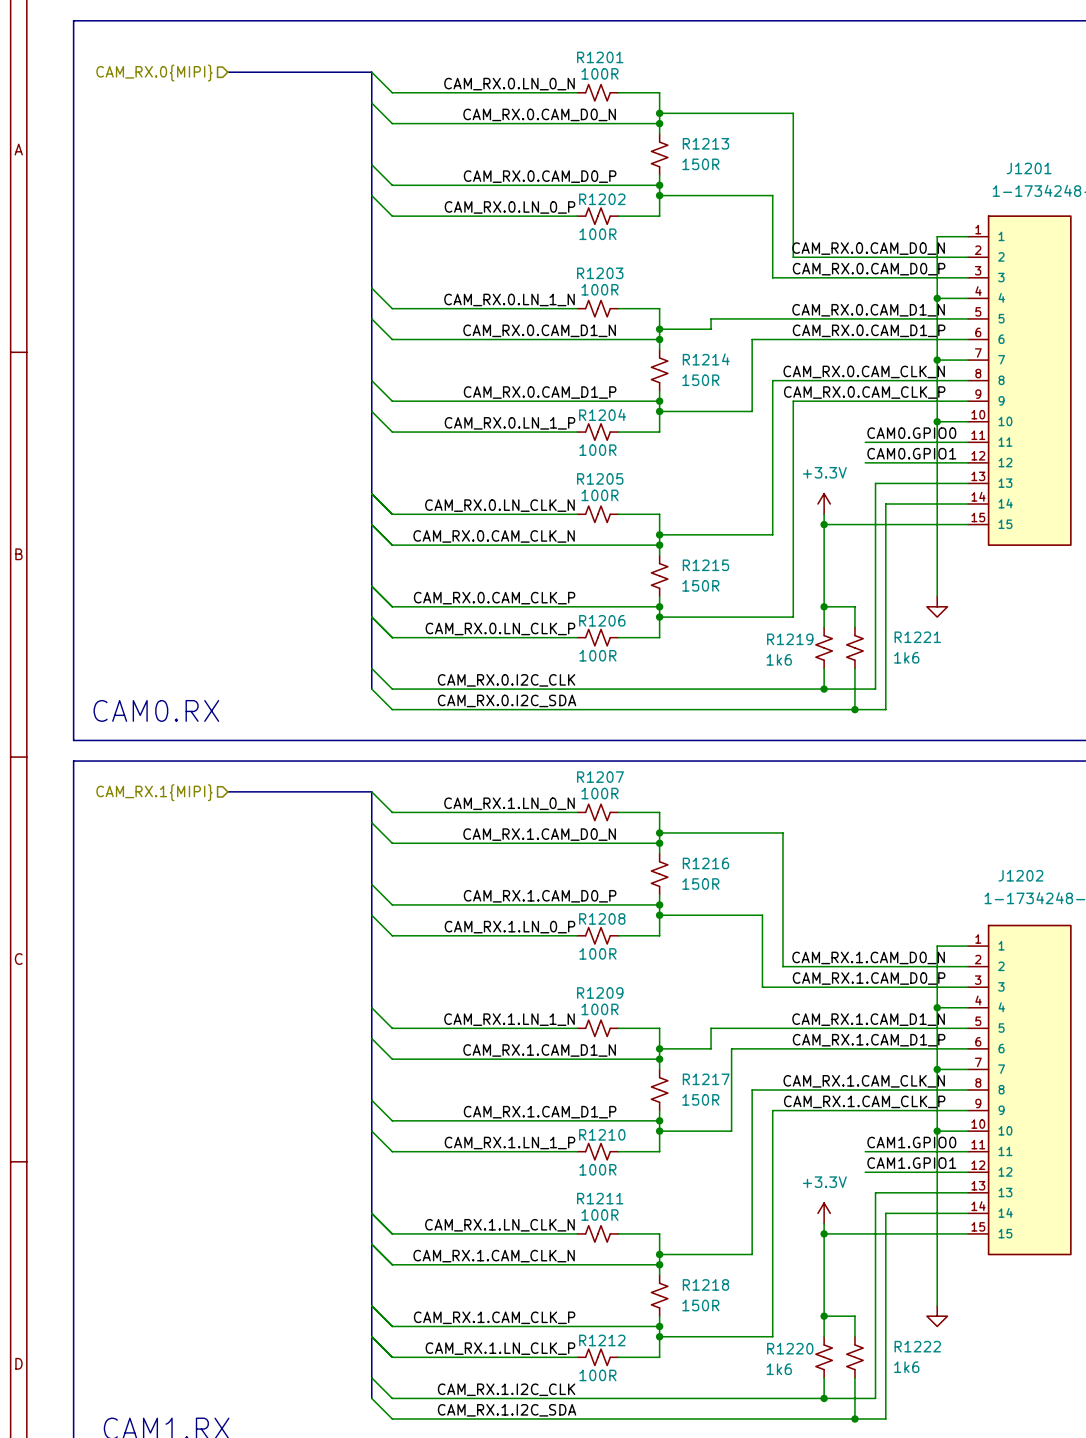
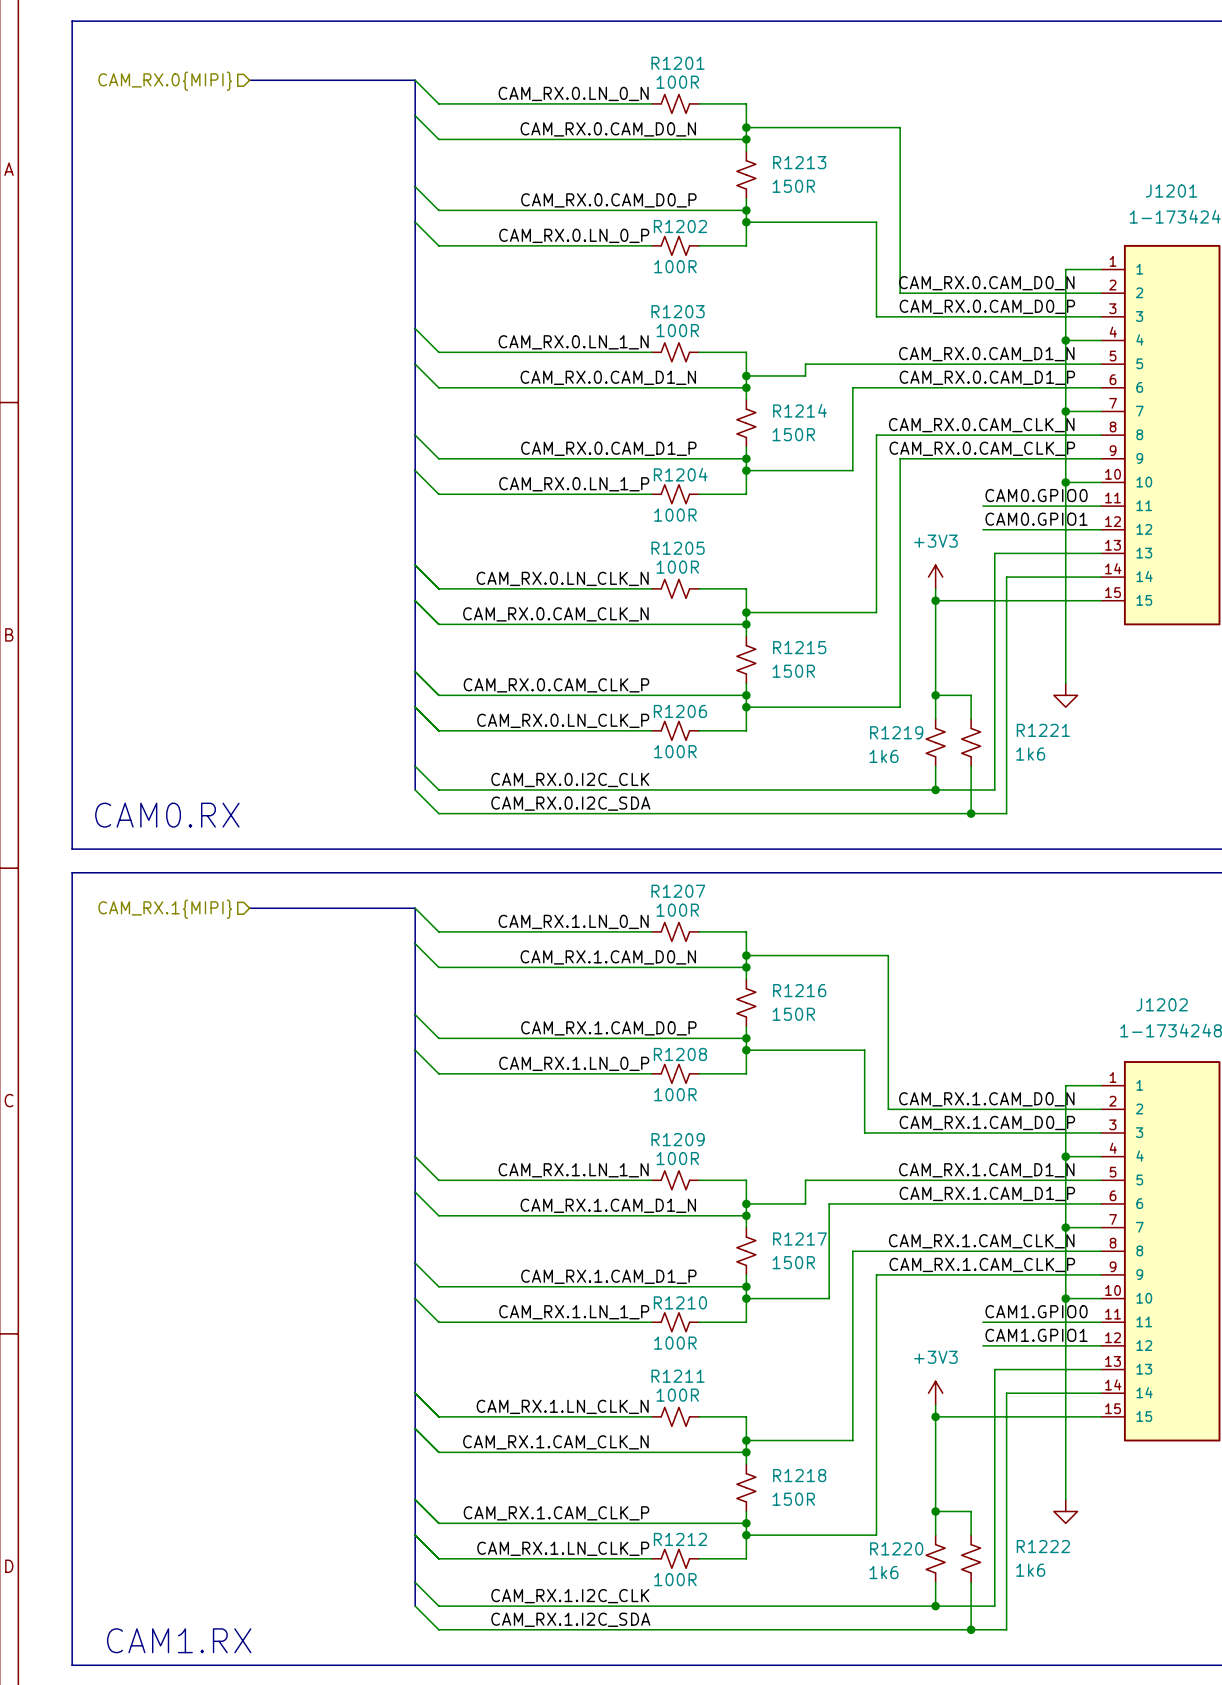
power symbol: +3.3V (824, 504) -> +3V3 (935, 577)
power symbol: +3.3V (824, 1213) -> +3V3 (935, 1393)

